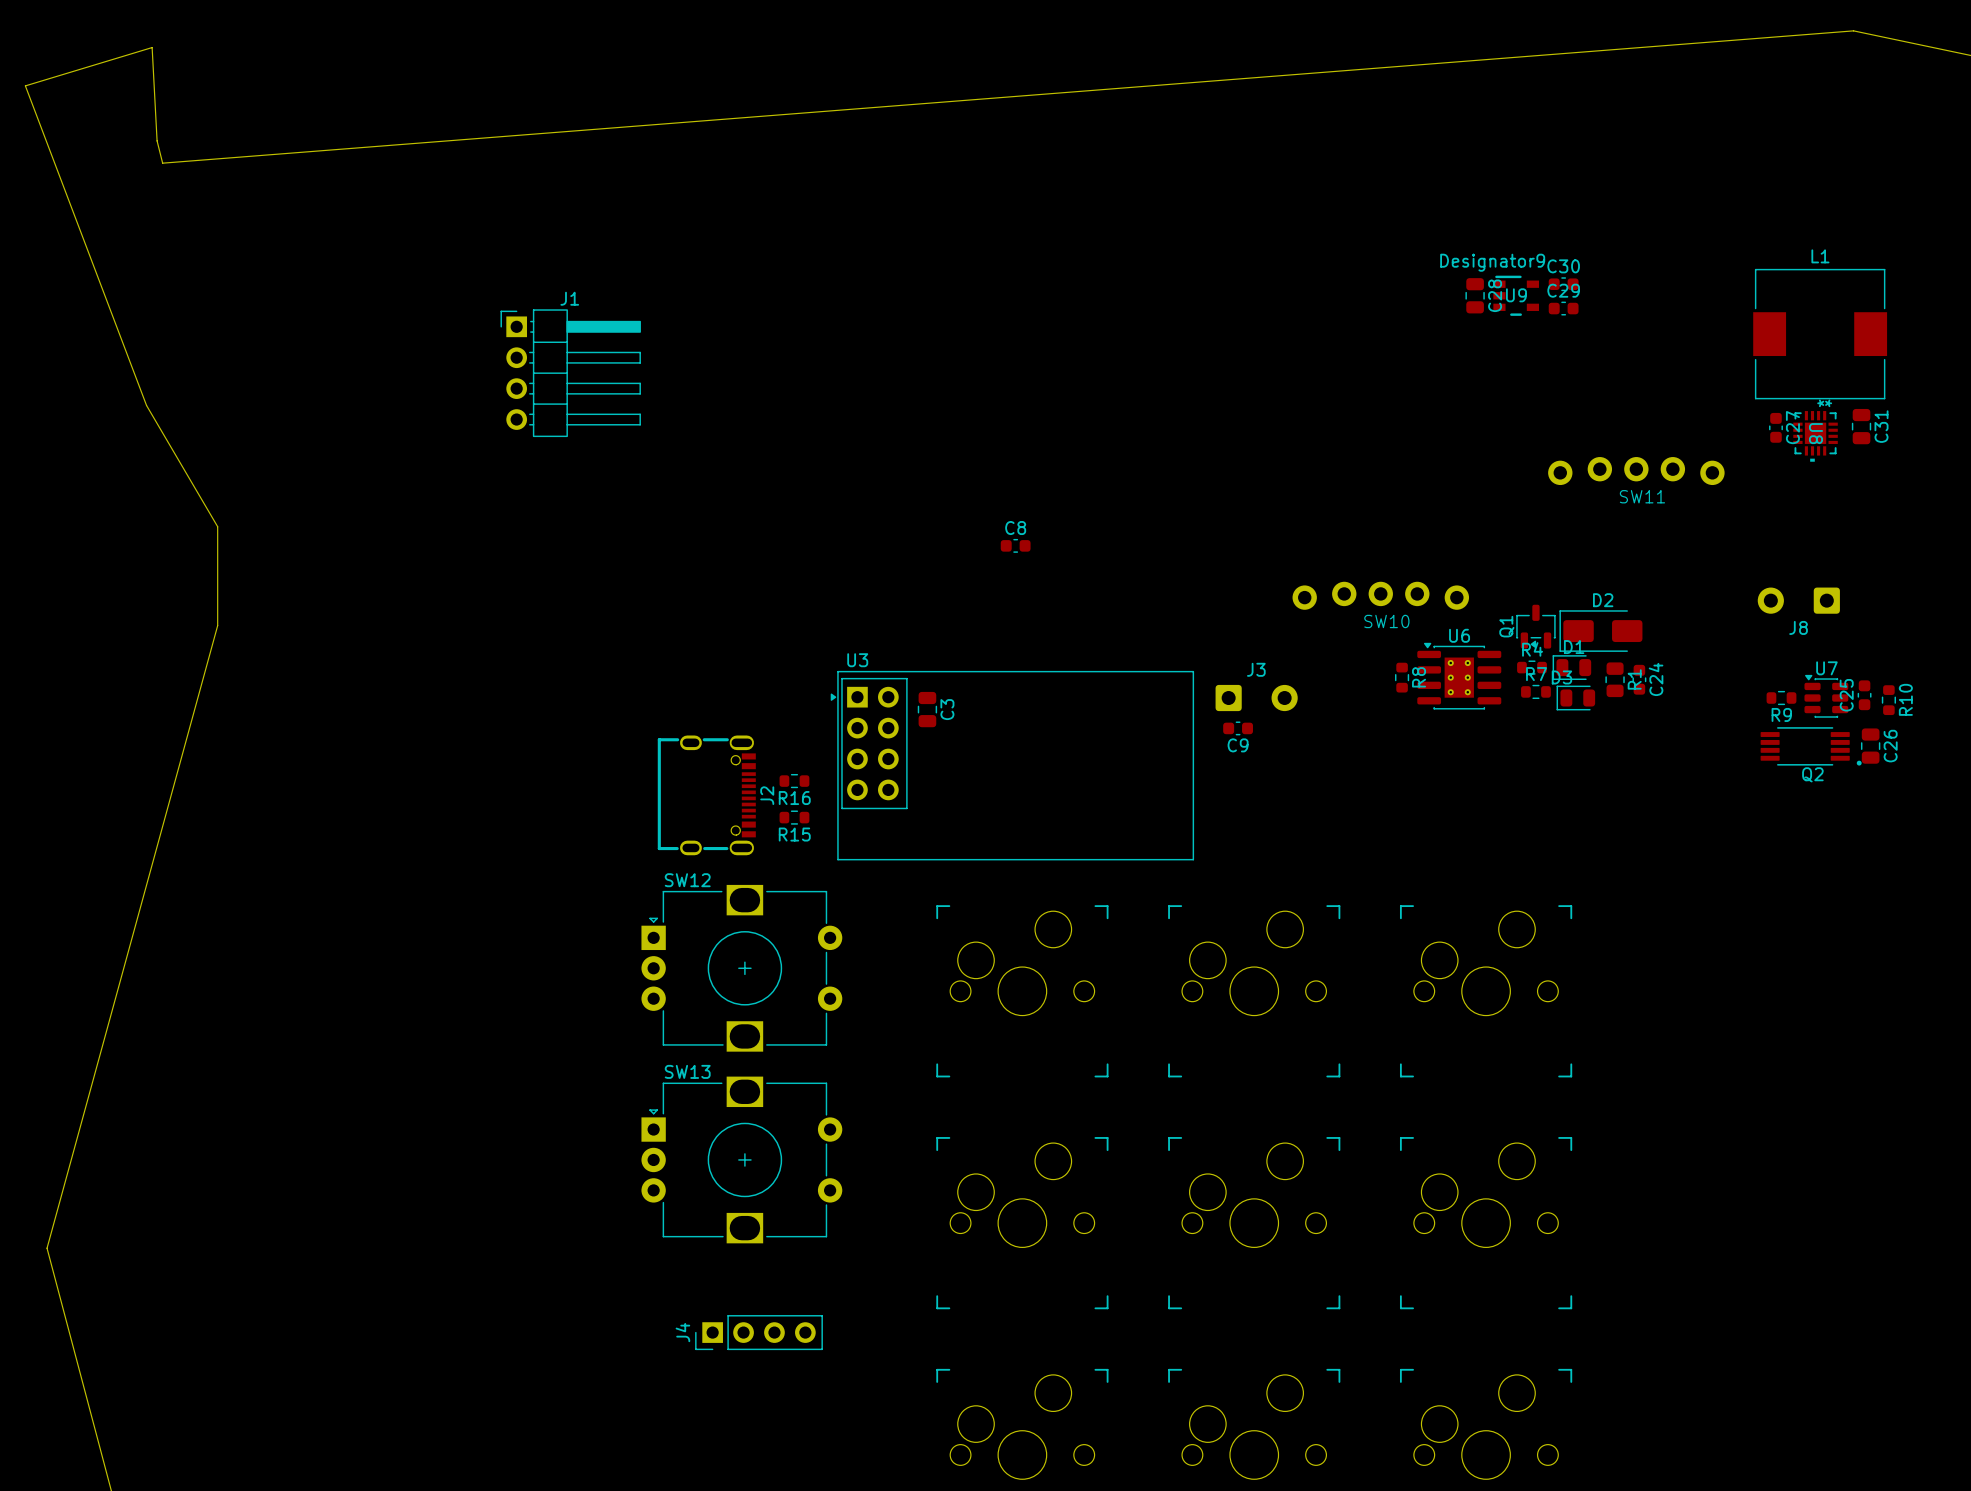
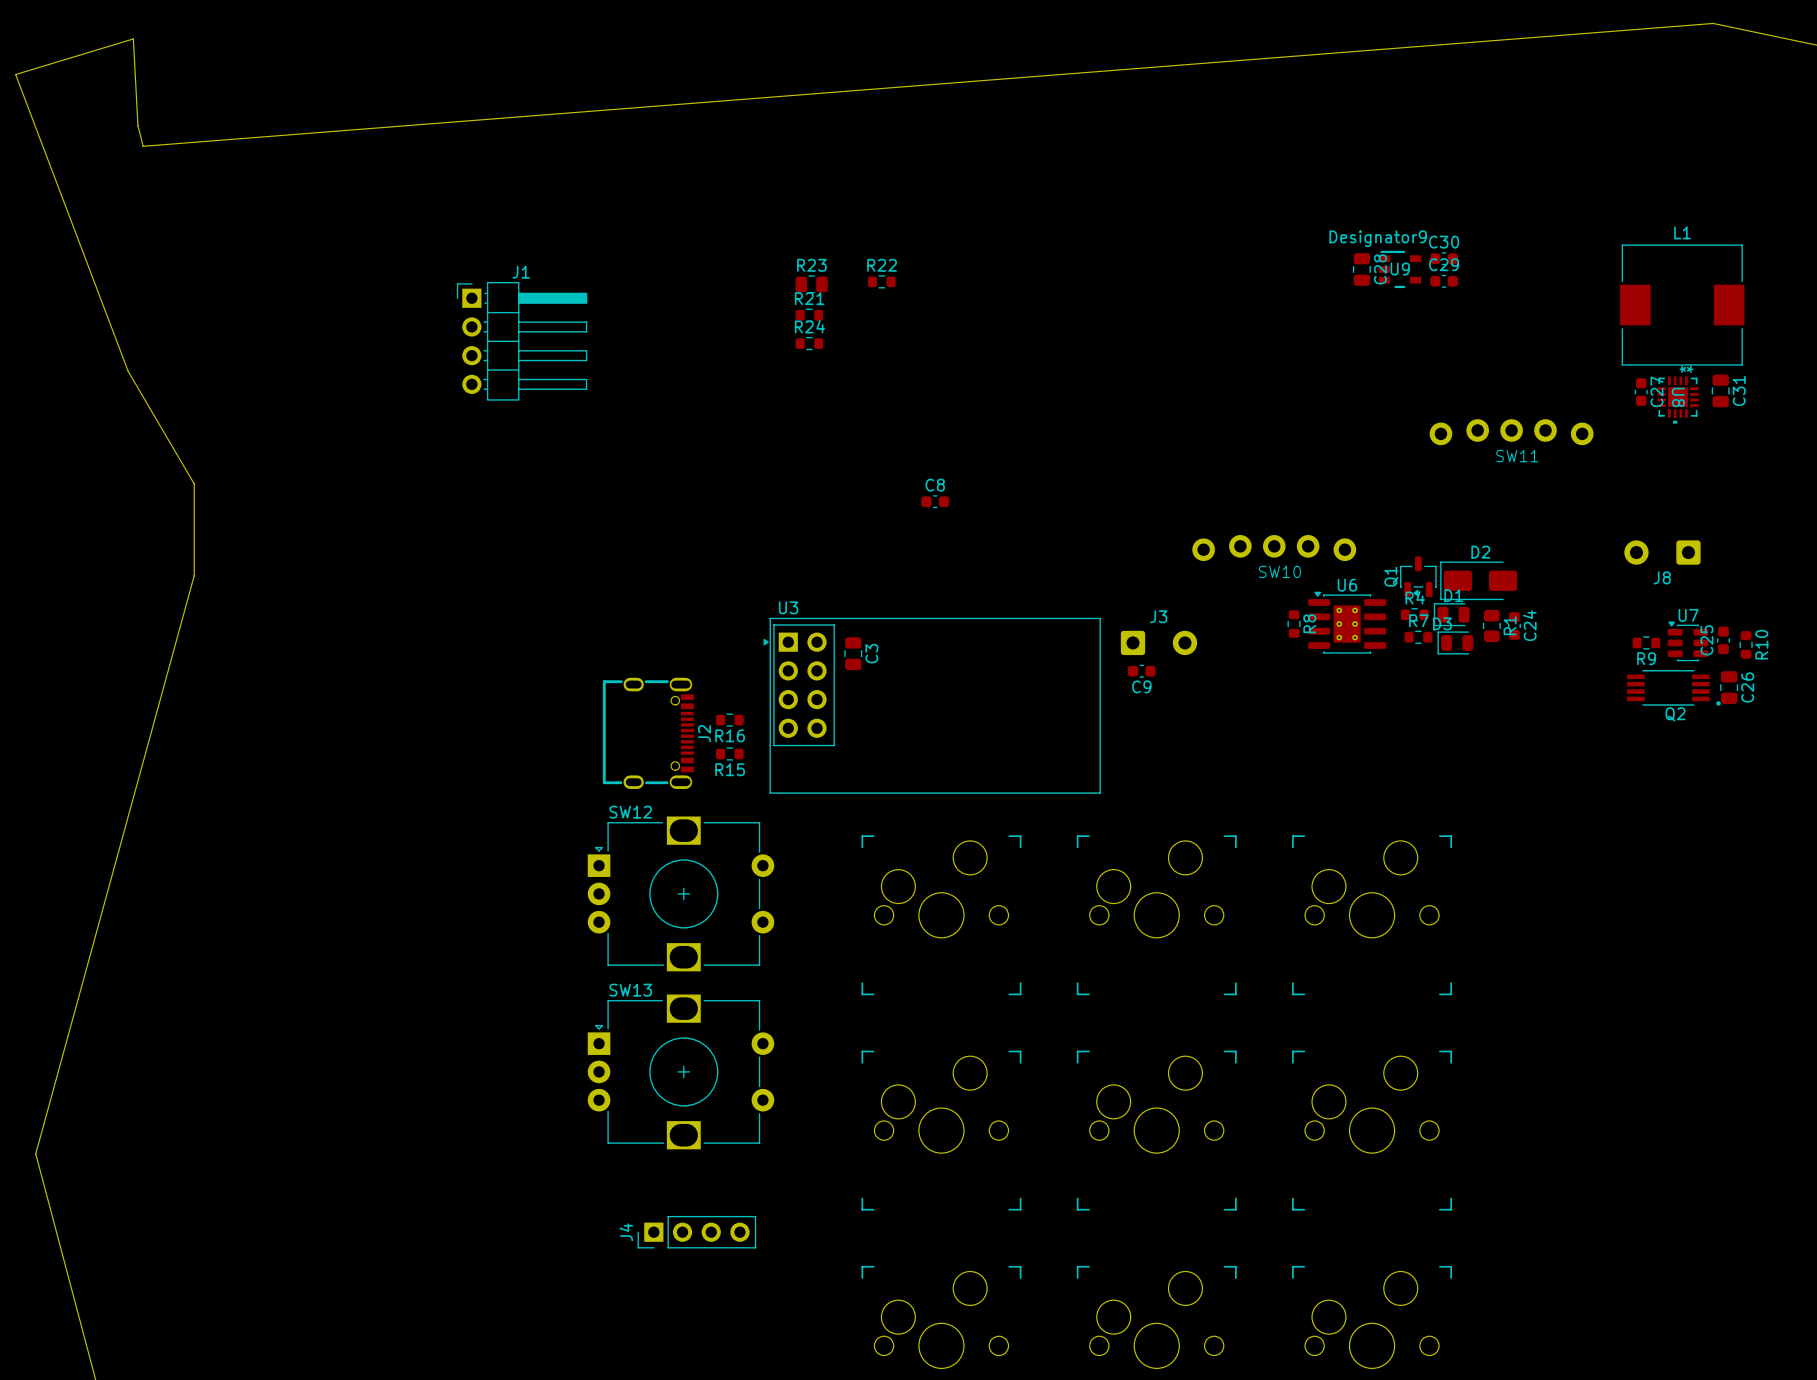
R22: none -> (881, 281)
R23: none -> (811, 284)
R21: none -> (809, 315)
R24: none -> (809, 343)

